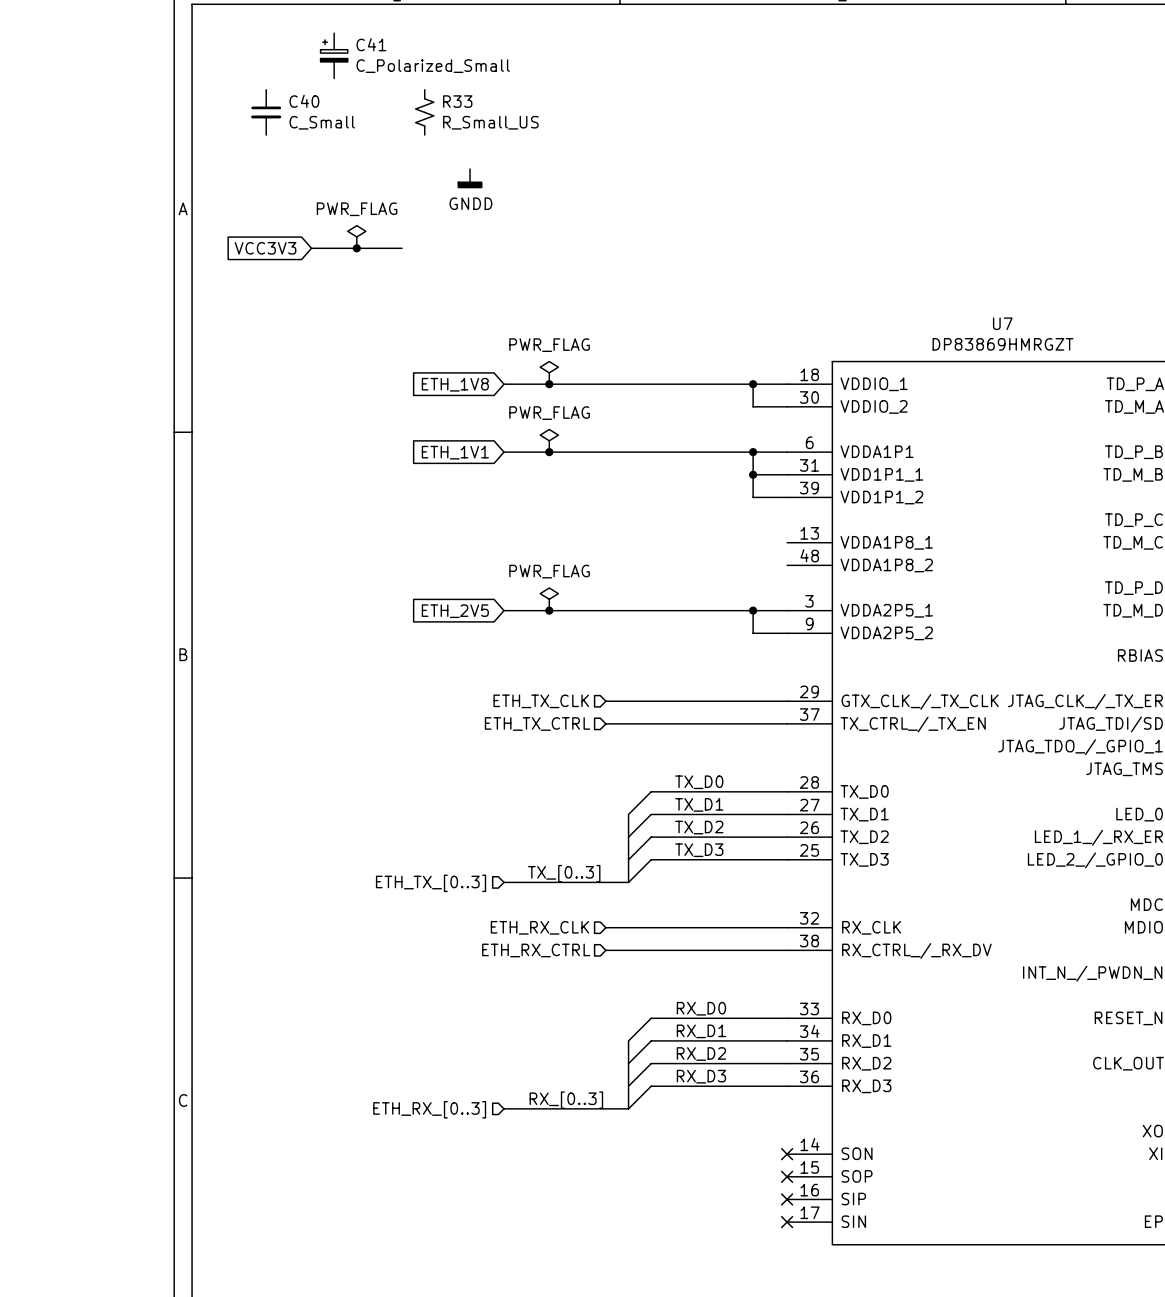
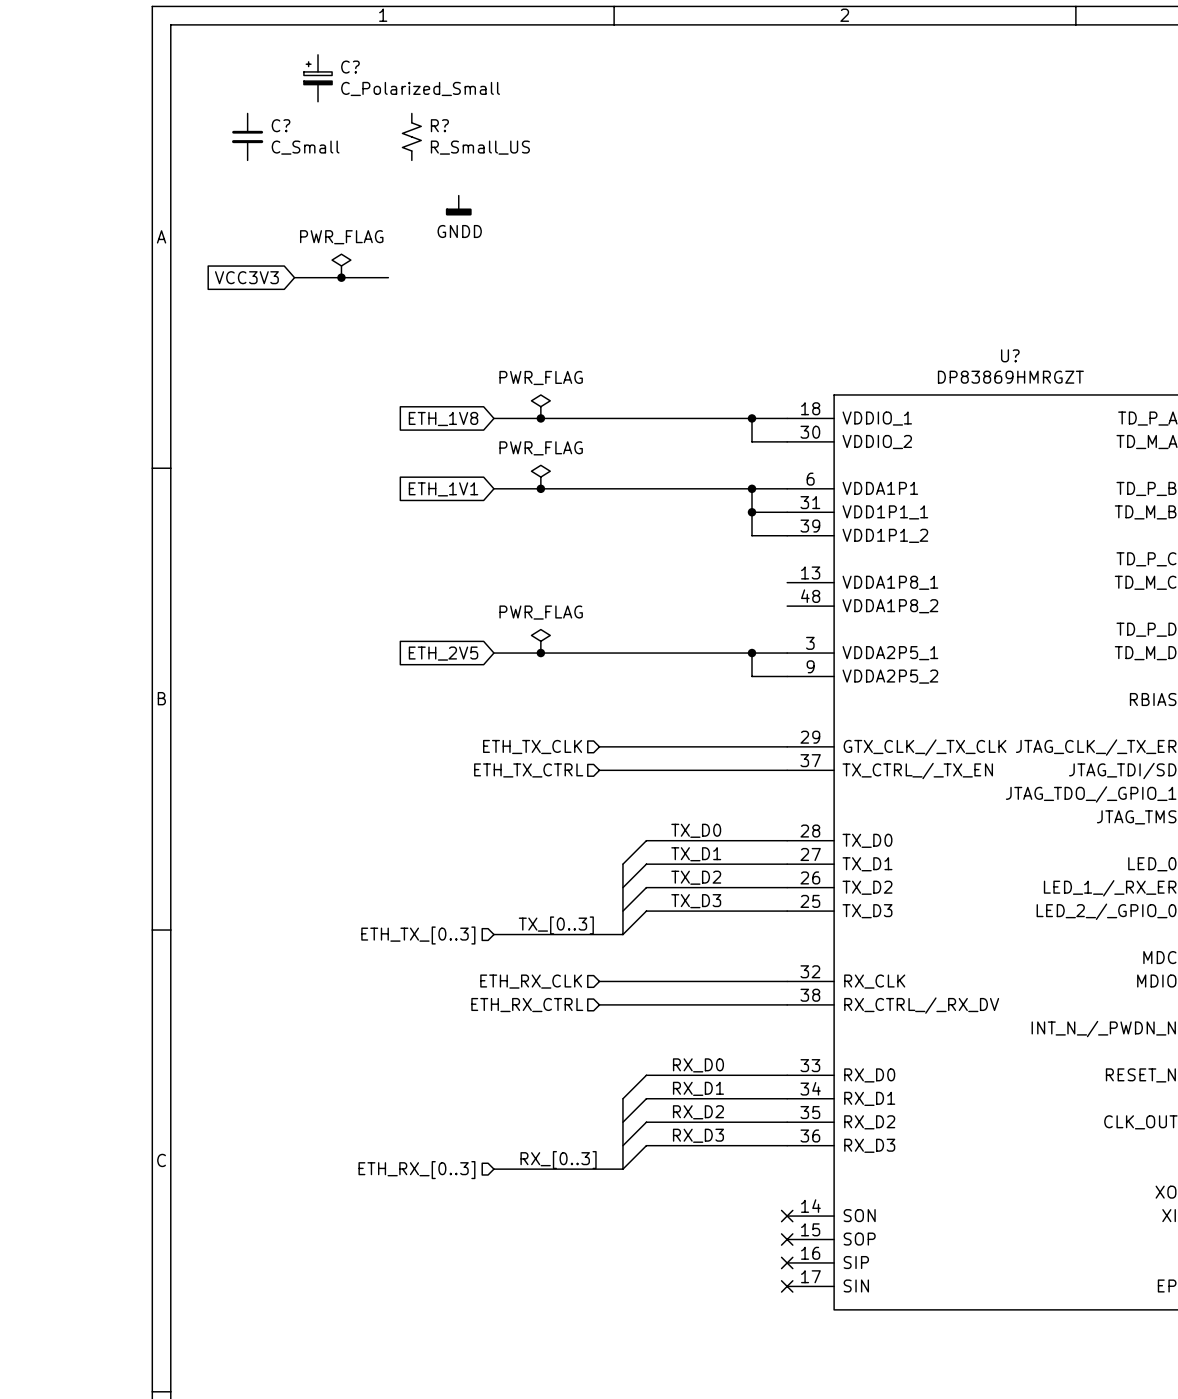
C41 name: C41 (371, 44) -> C? (350, 67)
C40 name: C40 (304, 101) -> C? (281, 125)
R33 name: R33 (457, 101) -> R? (439, 125)
U7 name: U7 (1002, 323) -> U? (1010, 355)

